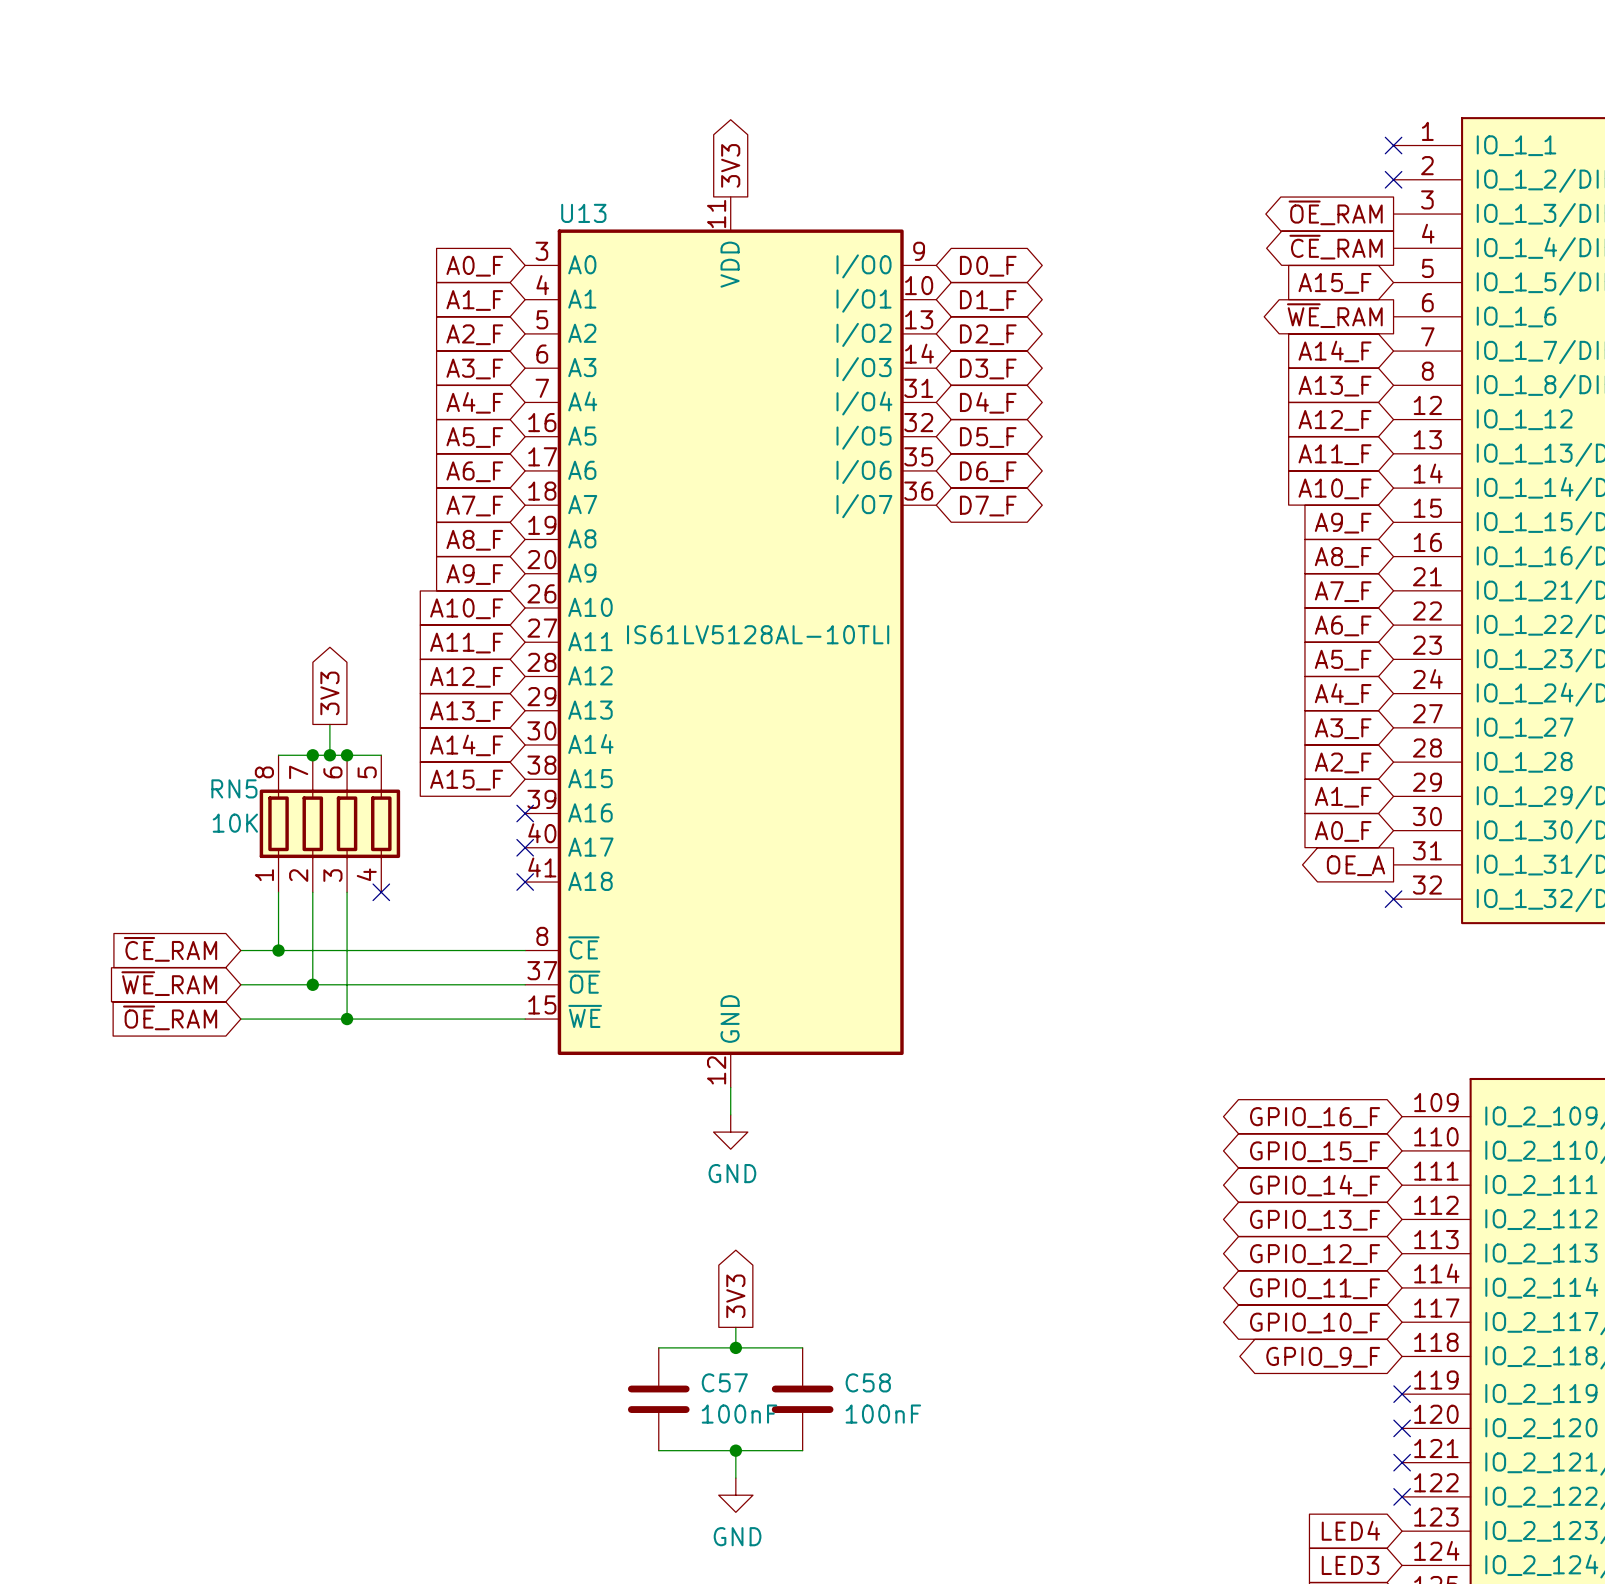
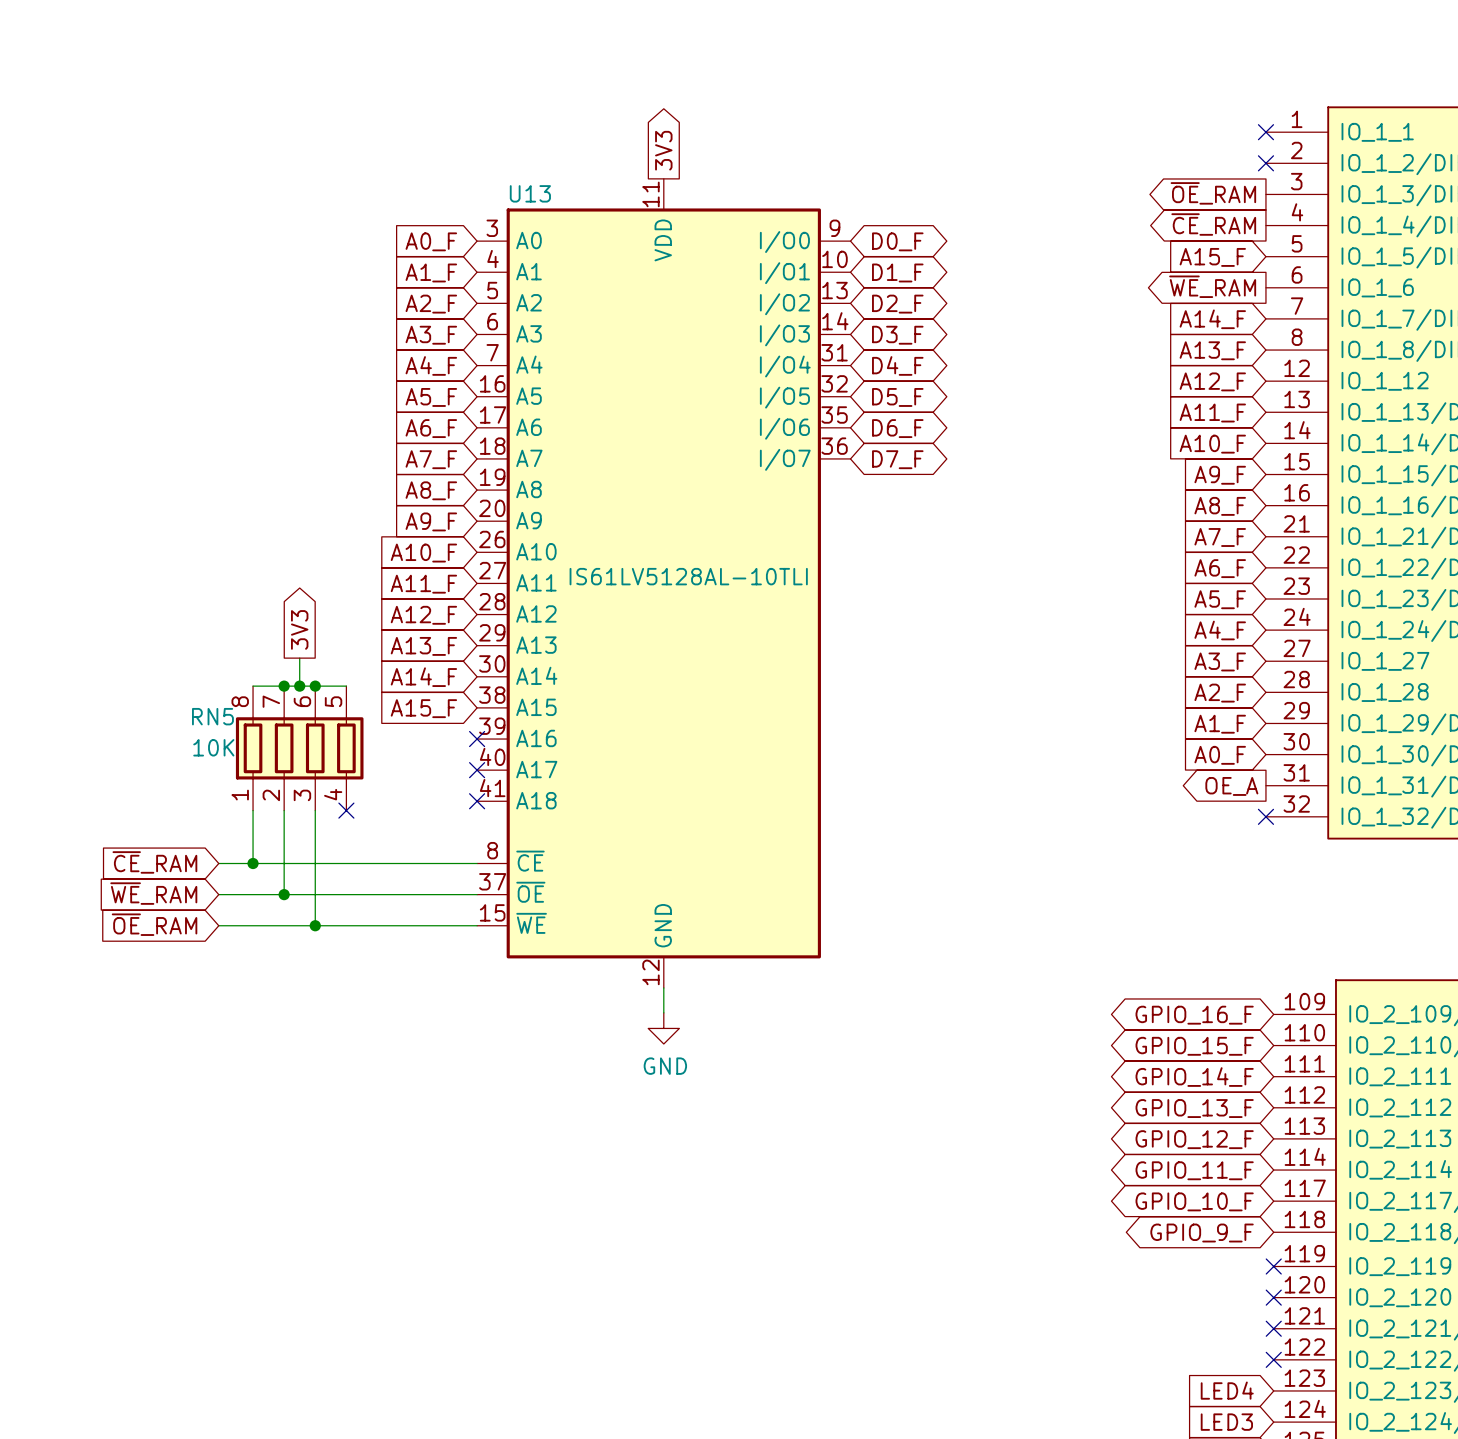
global label: 3V3 (735, 1296) -> none
wire: (735, 1327) (735, 1347) -> none
wire: (658, 1347) (802, 1347) -> none
junction: (735, 1347) -> none
C57: 100nF (658, 1399) -> none
C58: 100nF (802, 1399) -> none
wire: (658, 1450) (802, 1450) -> none
wire: (735, 1450) (735, 1478) -> none
junction: (735, 1450) -> none
power symbol: GND (735, 1495) -> none

